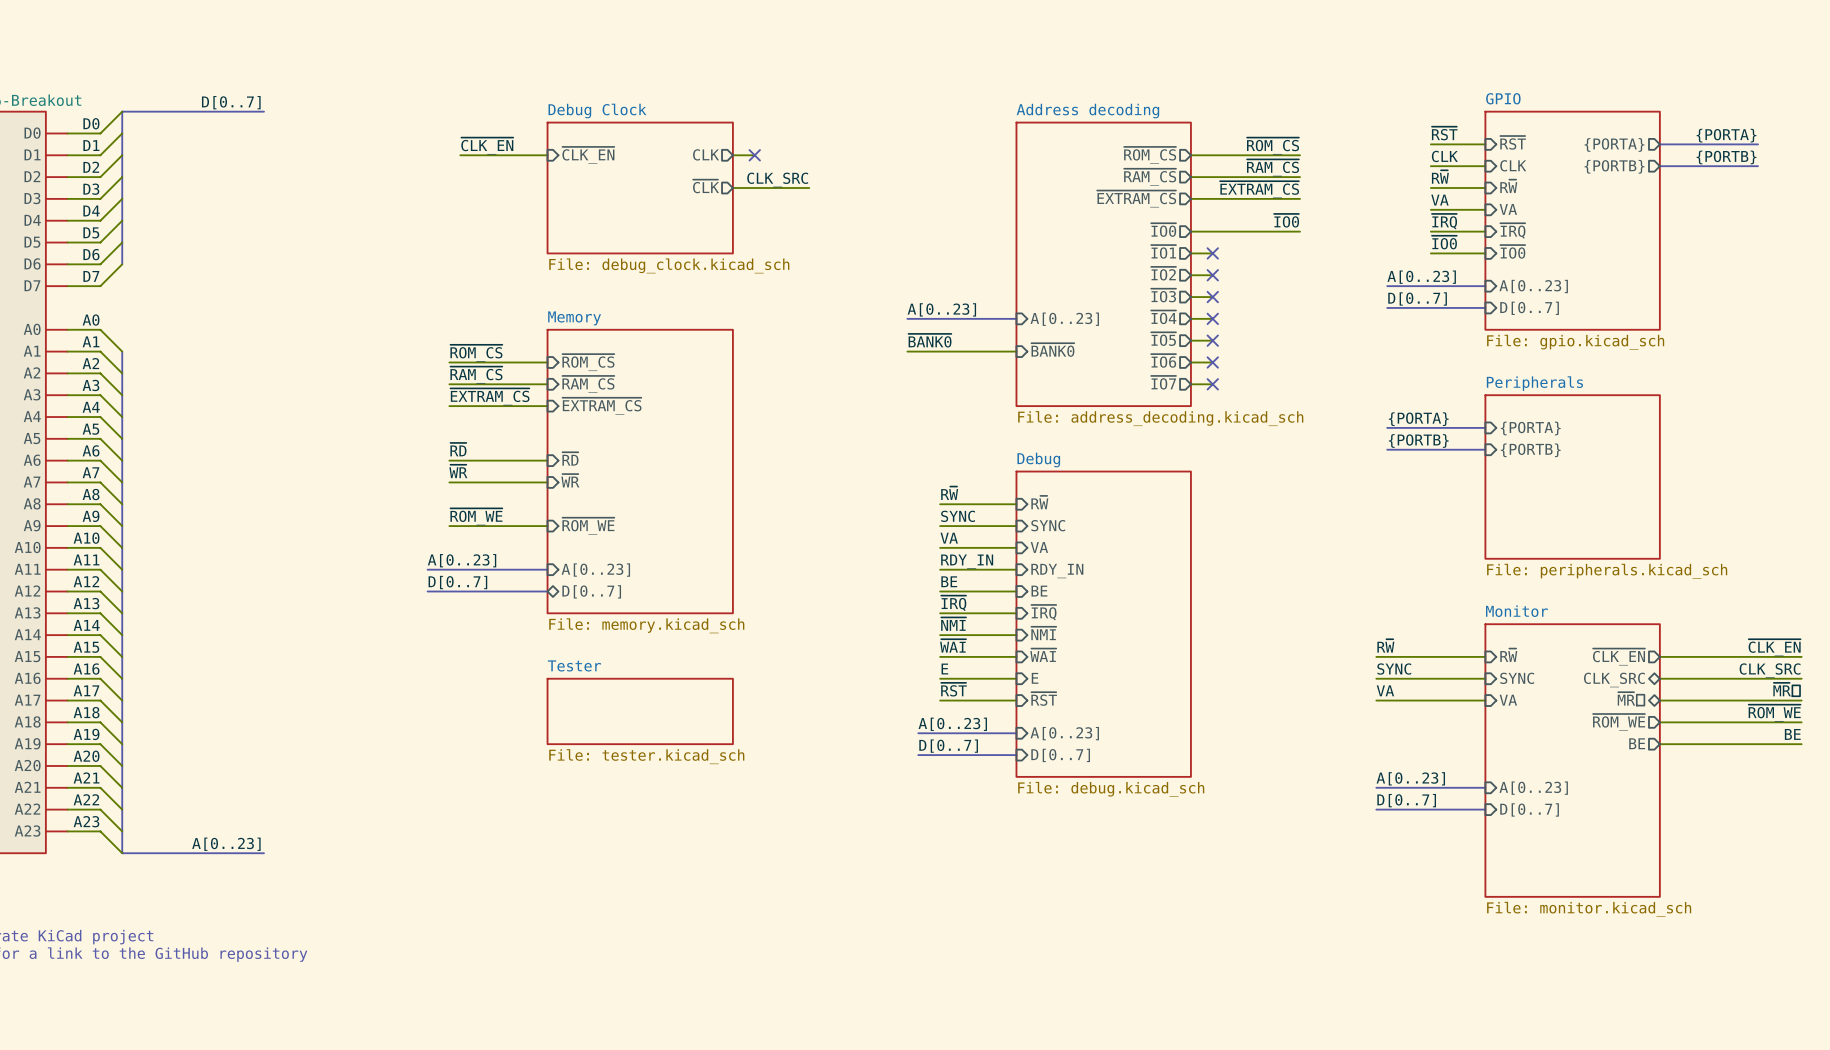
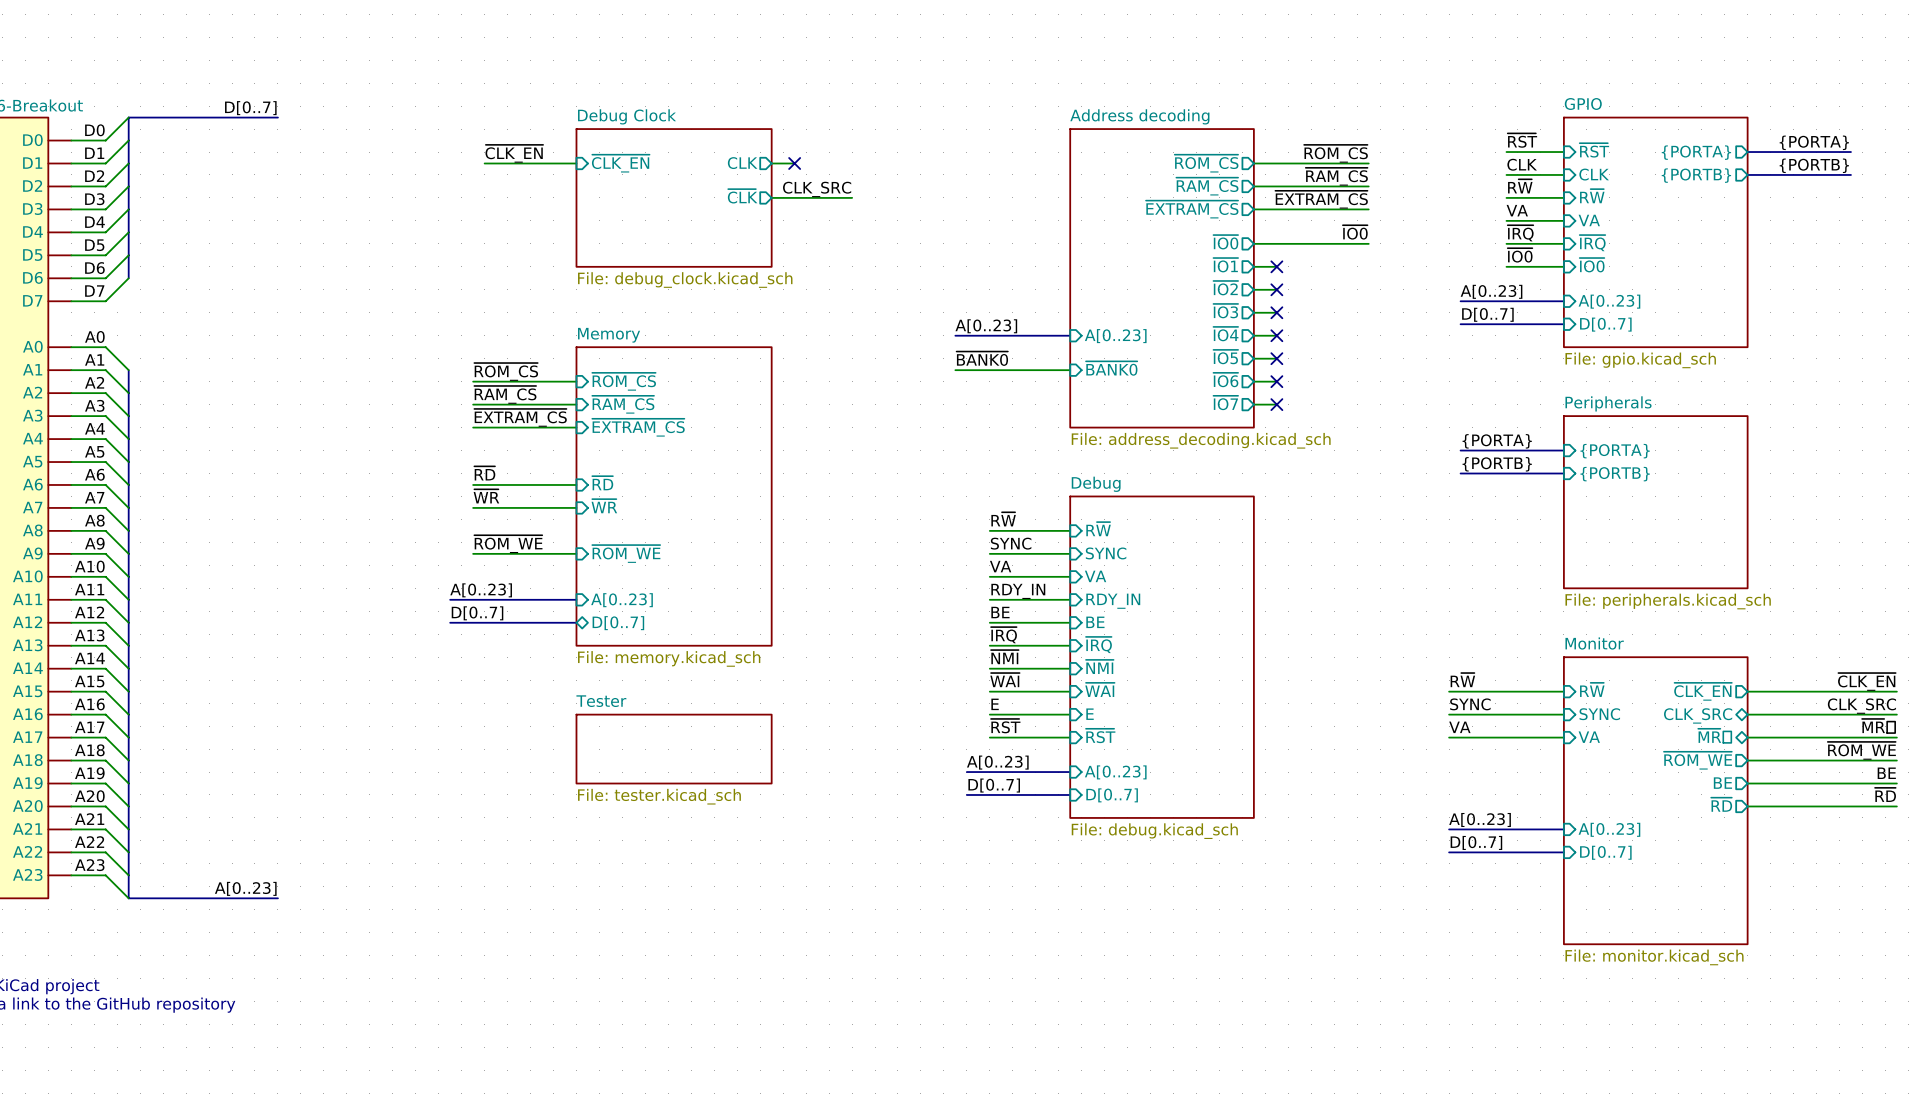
label: none -> ~{RD} (1885, 794)
sheet pin: none -> ~{RD} (1721, 804)
wire: none -> (1747, 806) (1896, 806)

